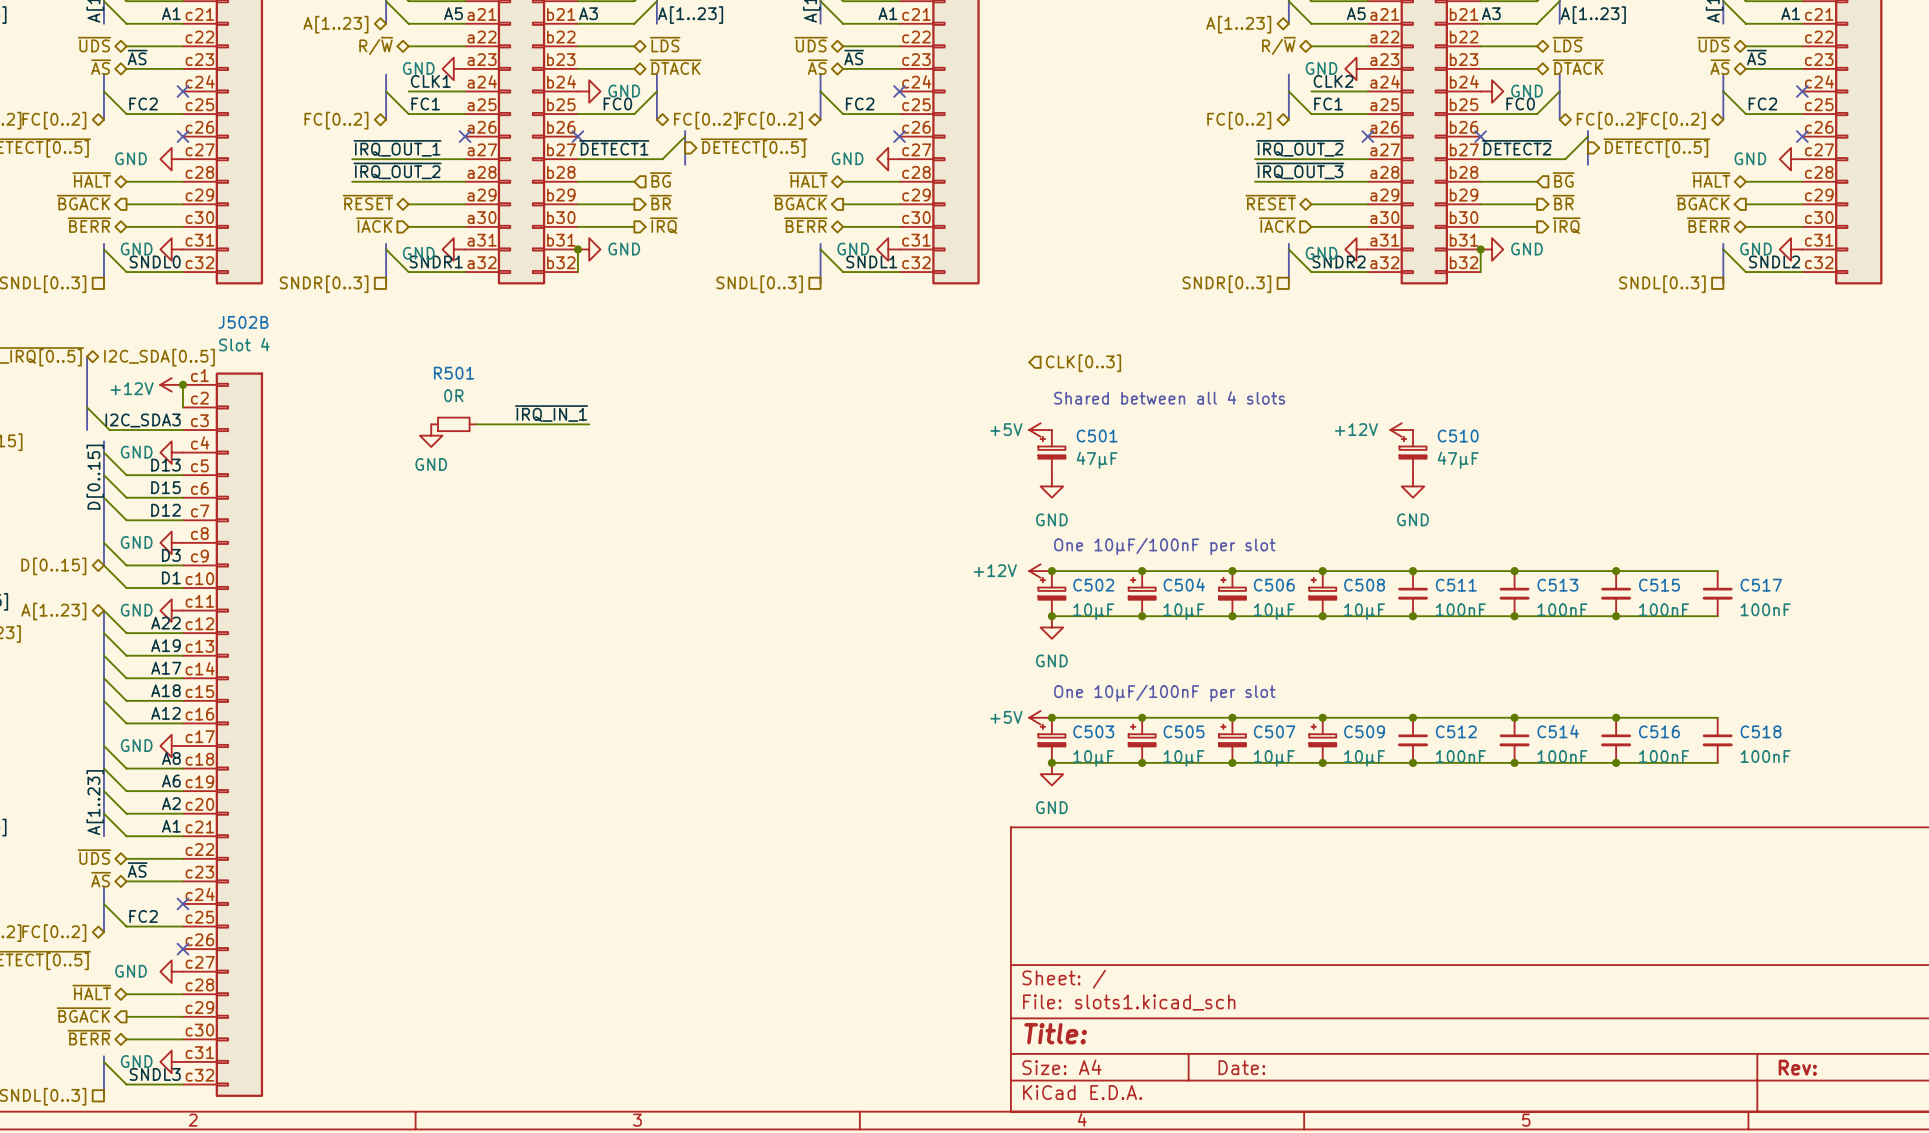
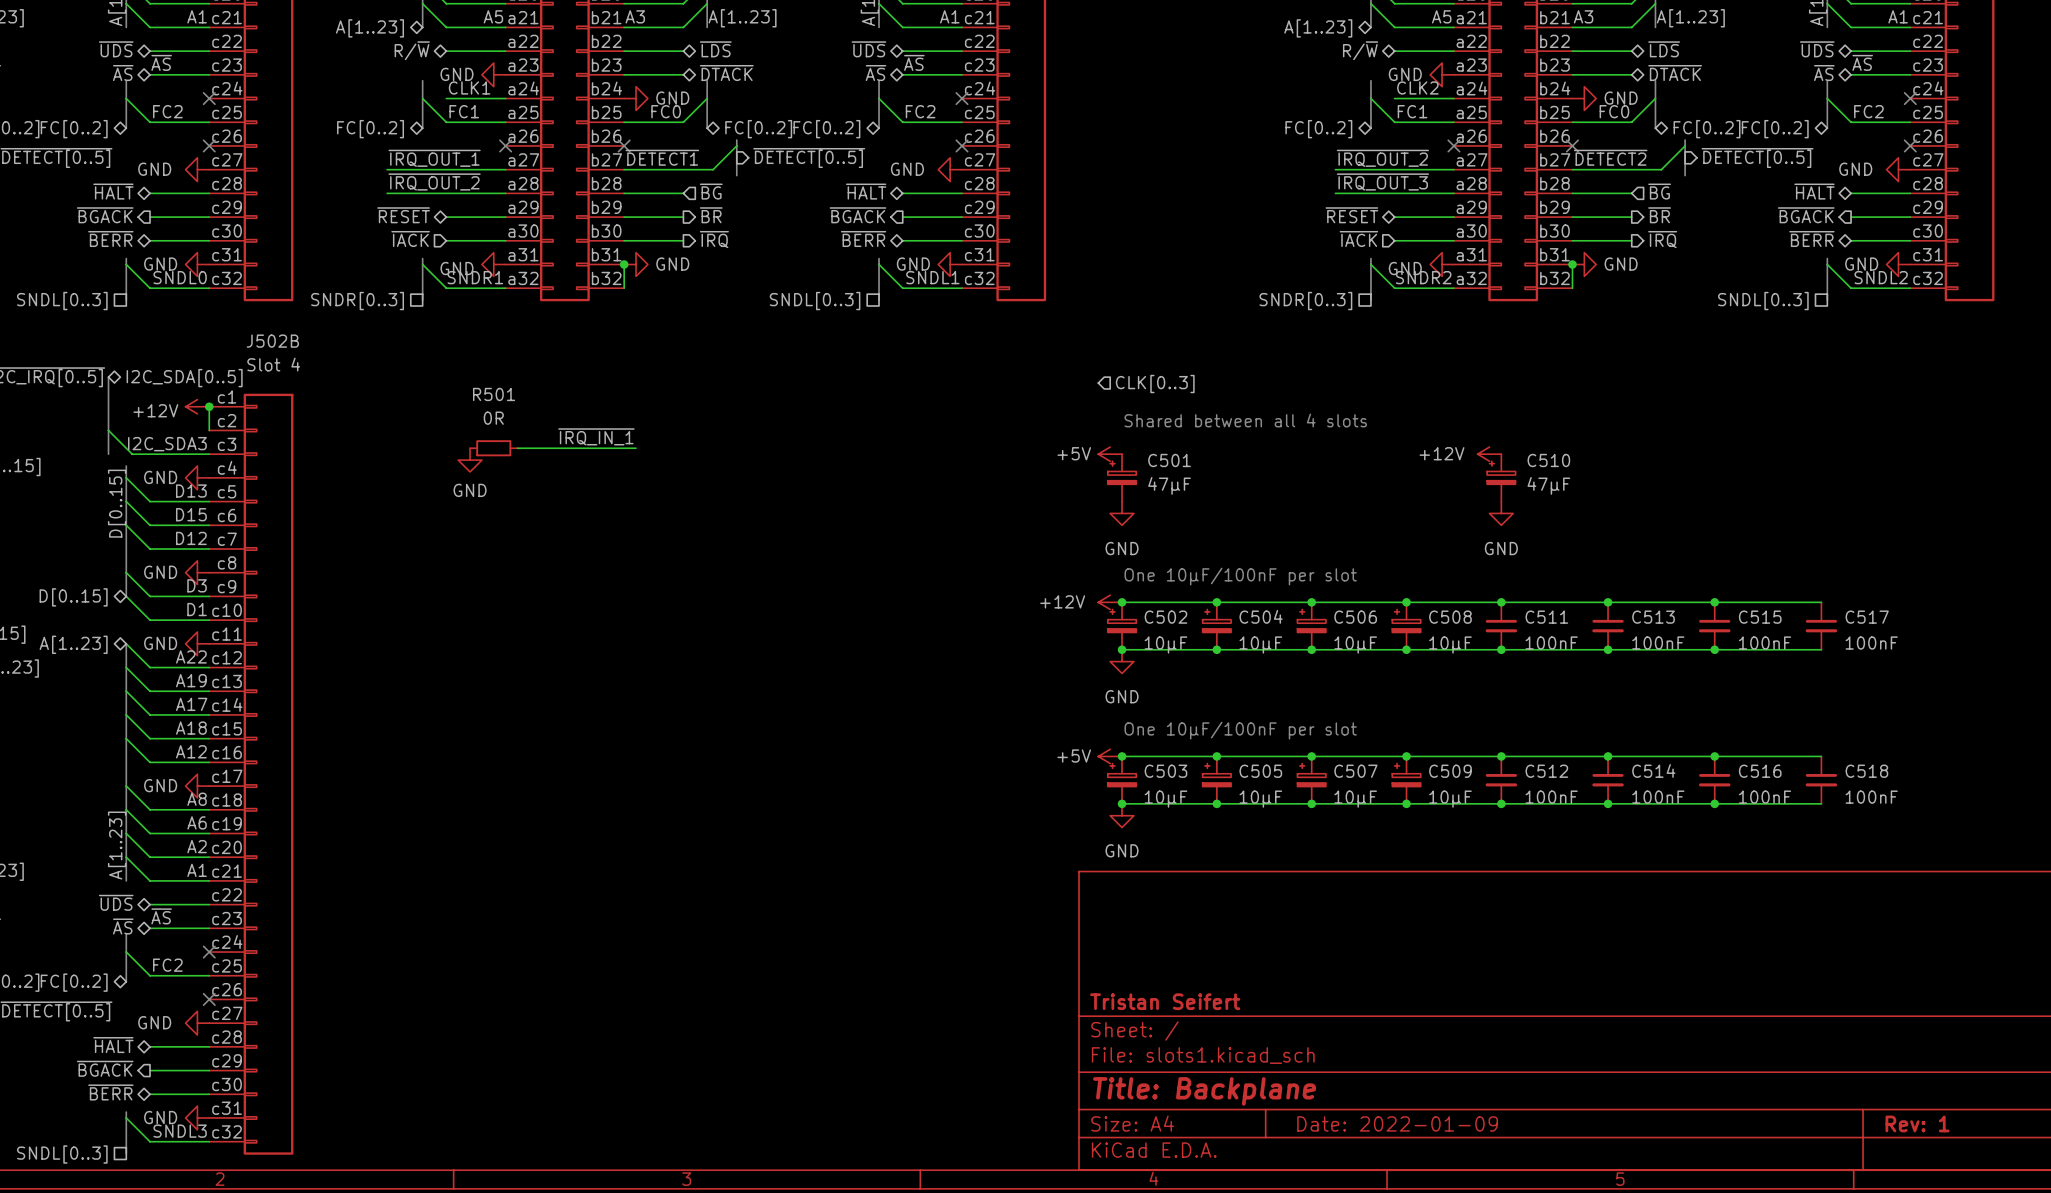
title block: none -> Tristan Seifert (1165, 1001)
title block: Title: (1055, 1033) -> Title: Backplane (1204, 1091)
title block: Date: (1241, 1067) -> Date: 2022-01-09 (1397, 1123)
title block: Rev: (1797, 1067) -> Rev: 1 (1917, 1123)

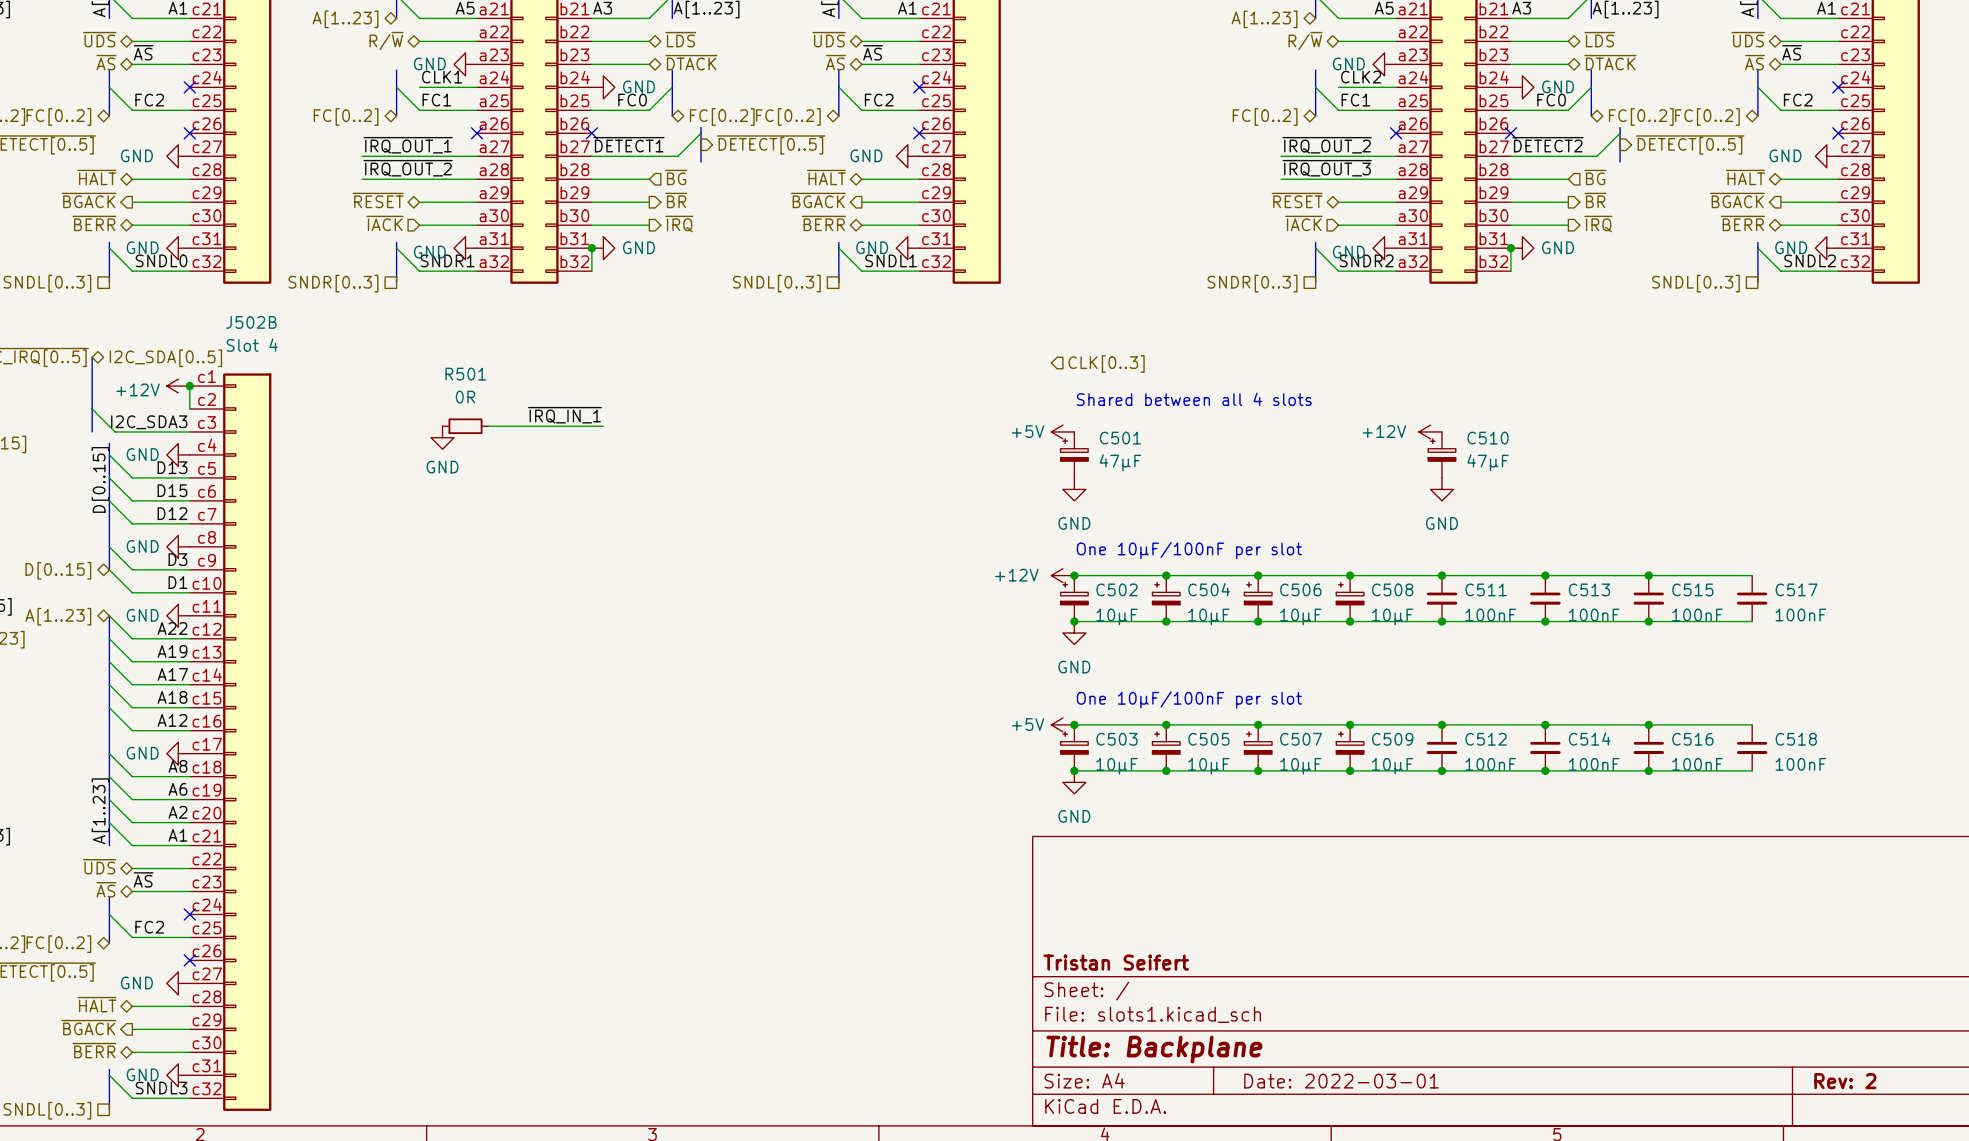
title block: Date: 2022-01-09 (1397, 1123) -> Date: 2022-03-01 (1341, 1081)
title block: Rev: 1 (1917, 1123) -> Rev: 2 (1845, 1081)

